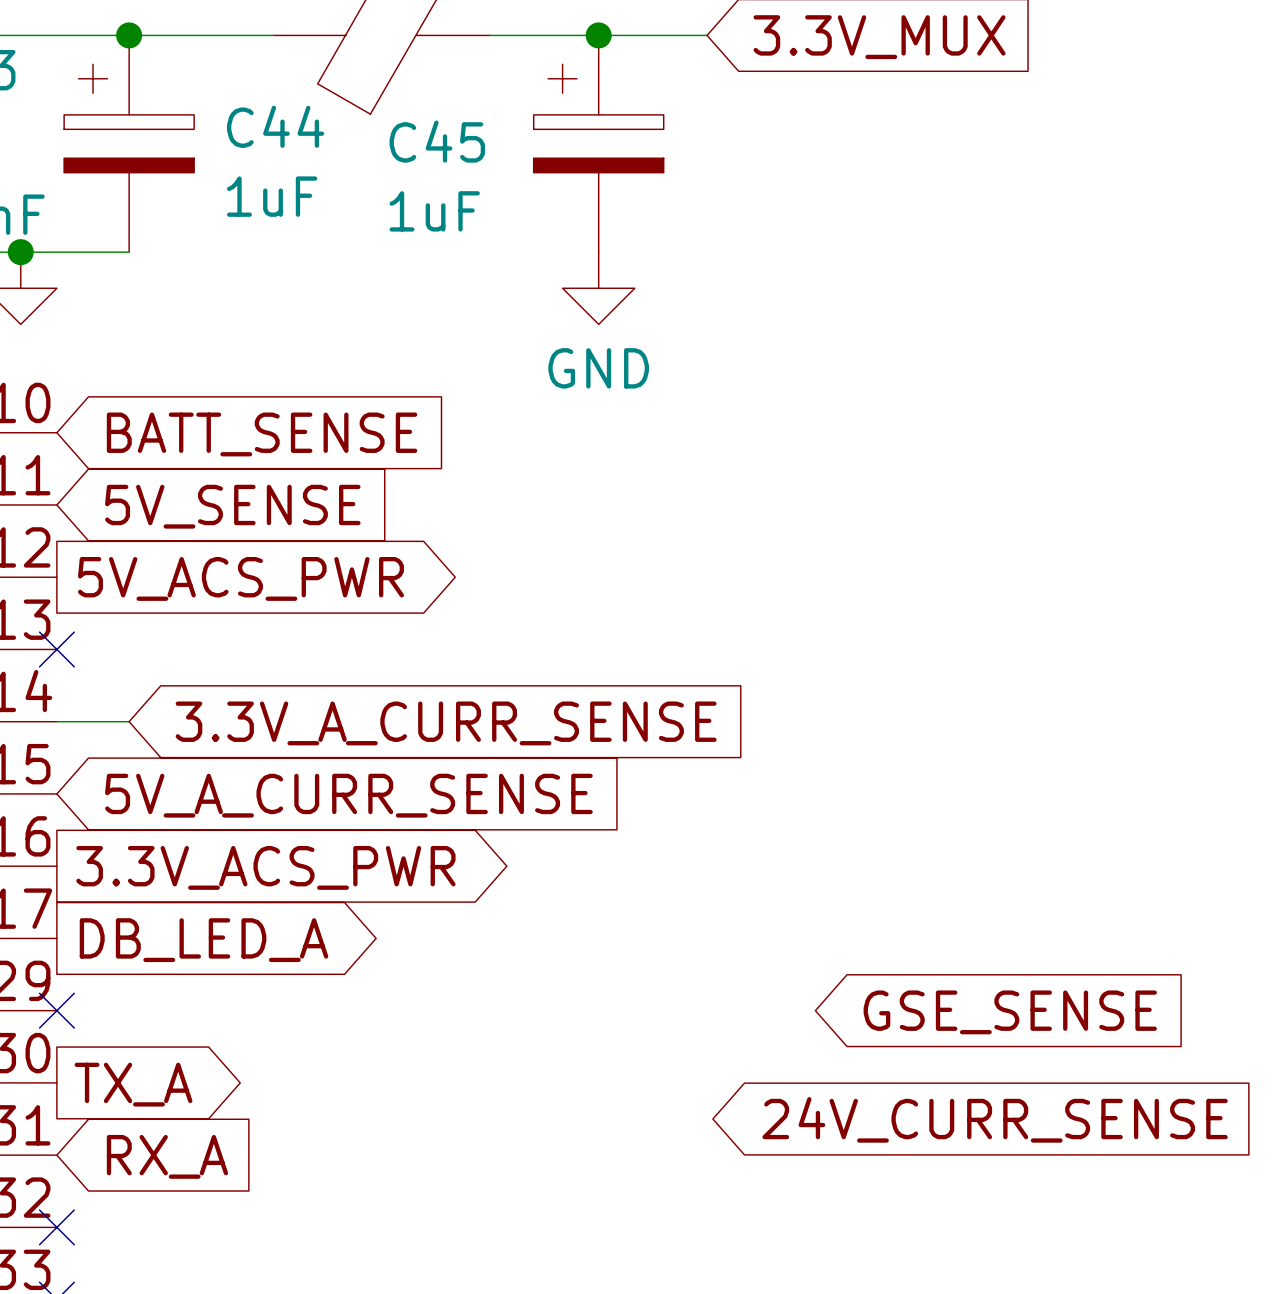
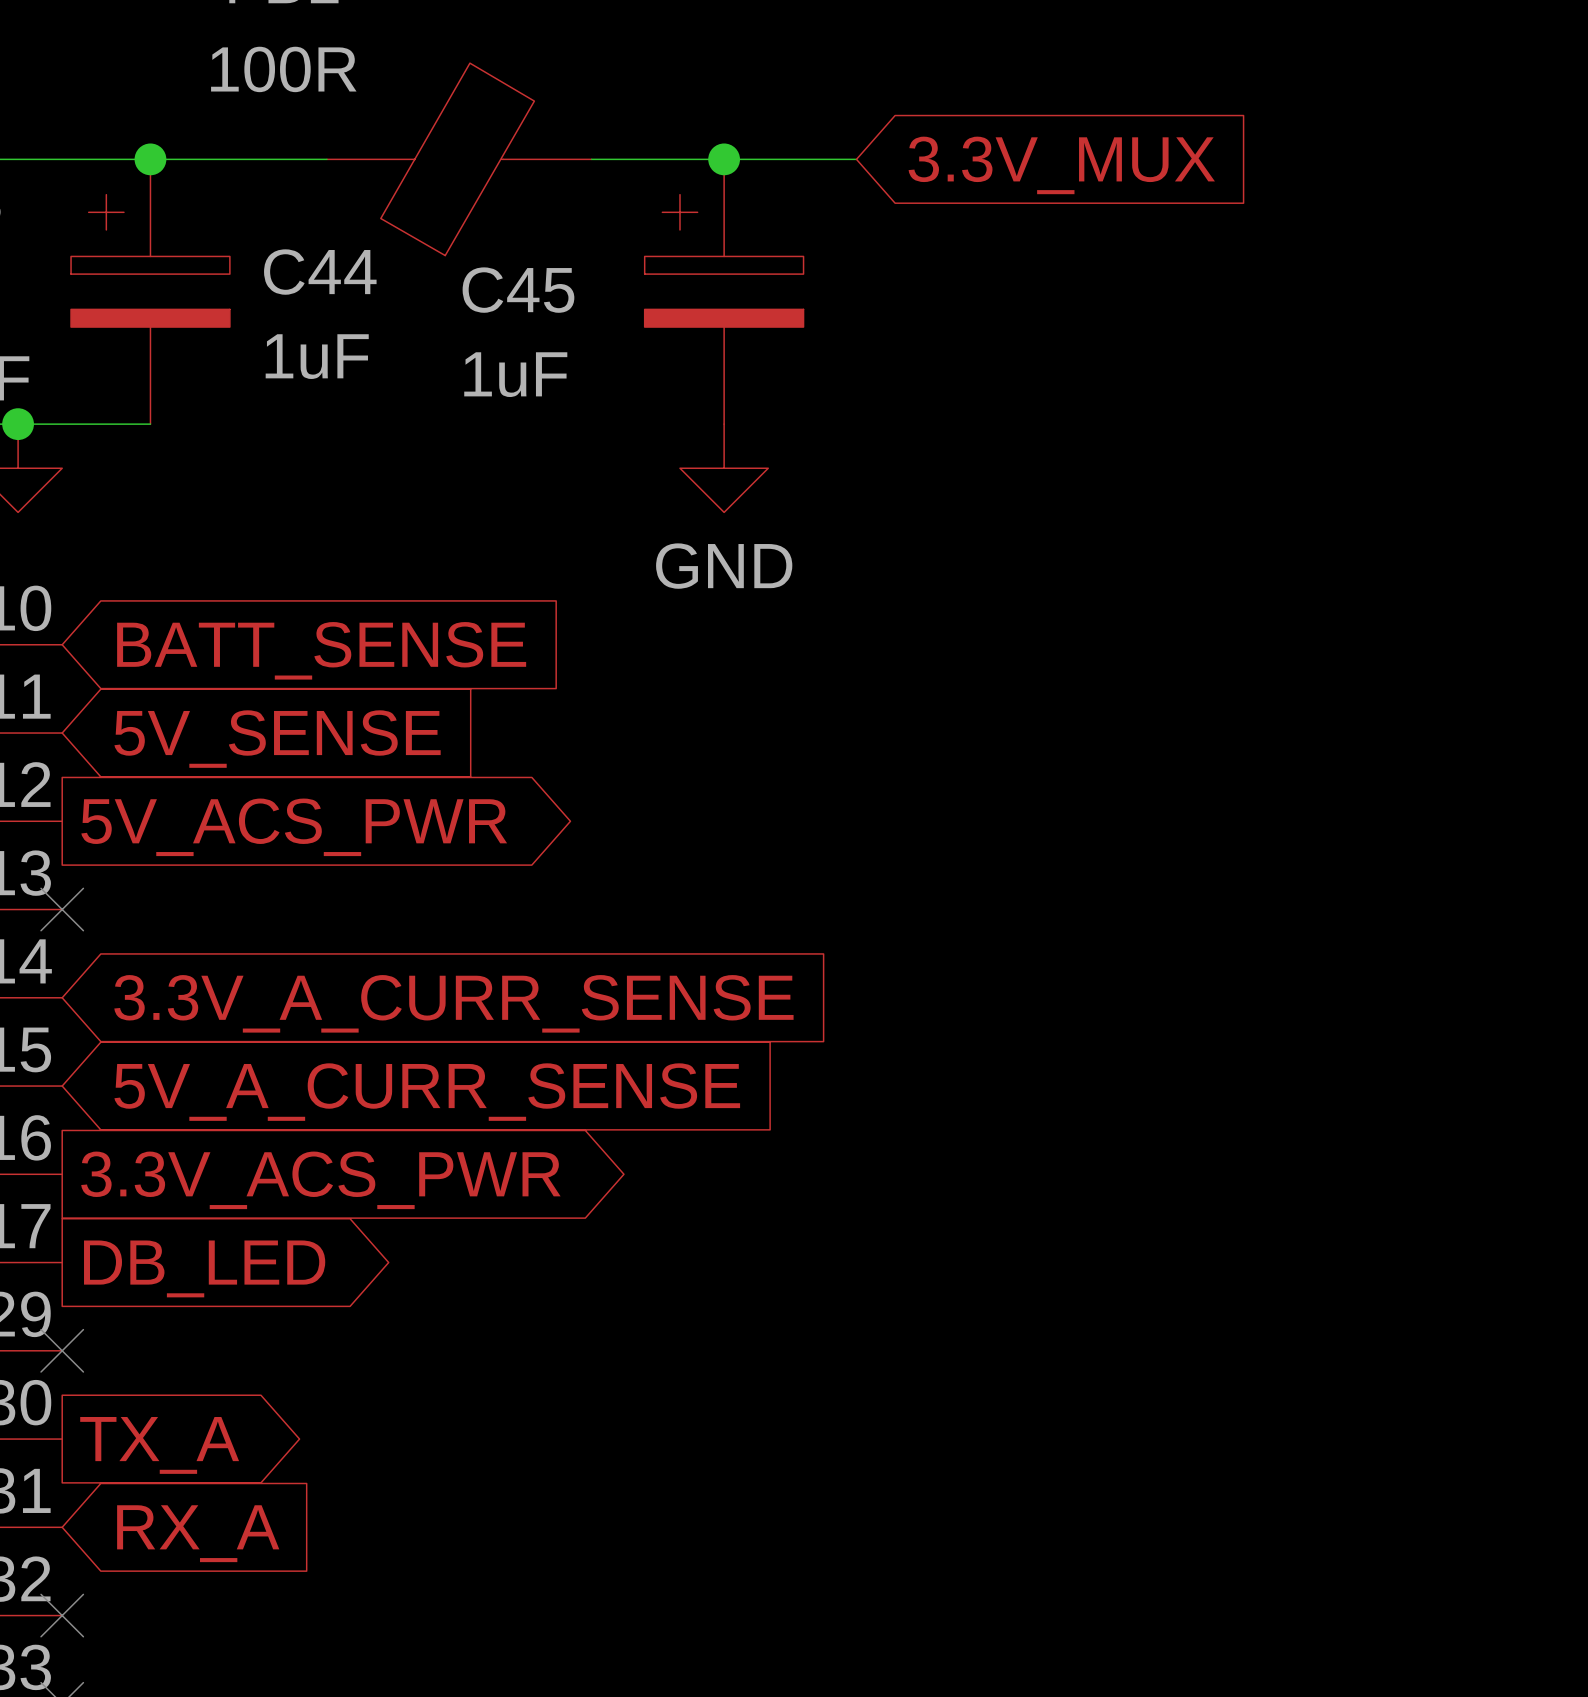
wire: (56, 721) (129, 721) -> none
global label position: 3.3V_A_CURR_SENSE (446, 723) -> 3.3V_A_CURR_SENSE (453, 1003)
global label: DB_LED_A (204, 940) -> DB_LED (204, 1268)
global label: GSE_SENSE (1010, 1012) -> none
global label: 24V_CURR_SENSE (995, 1119) -> none

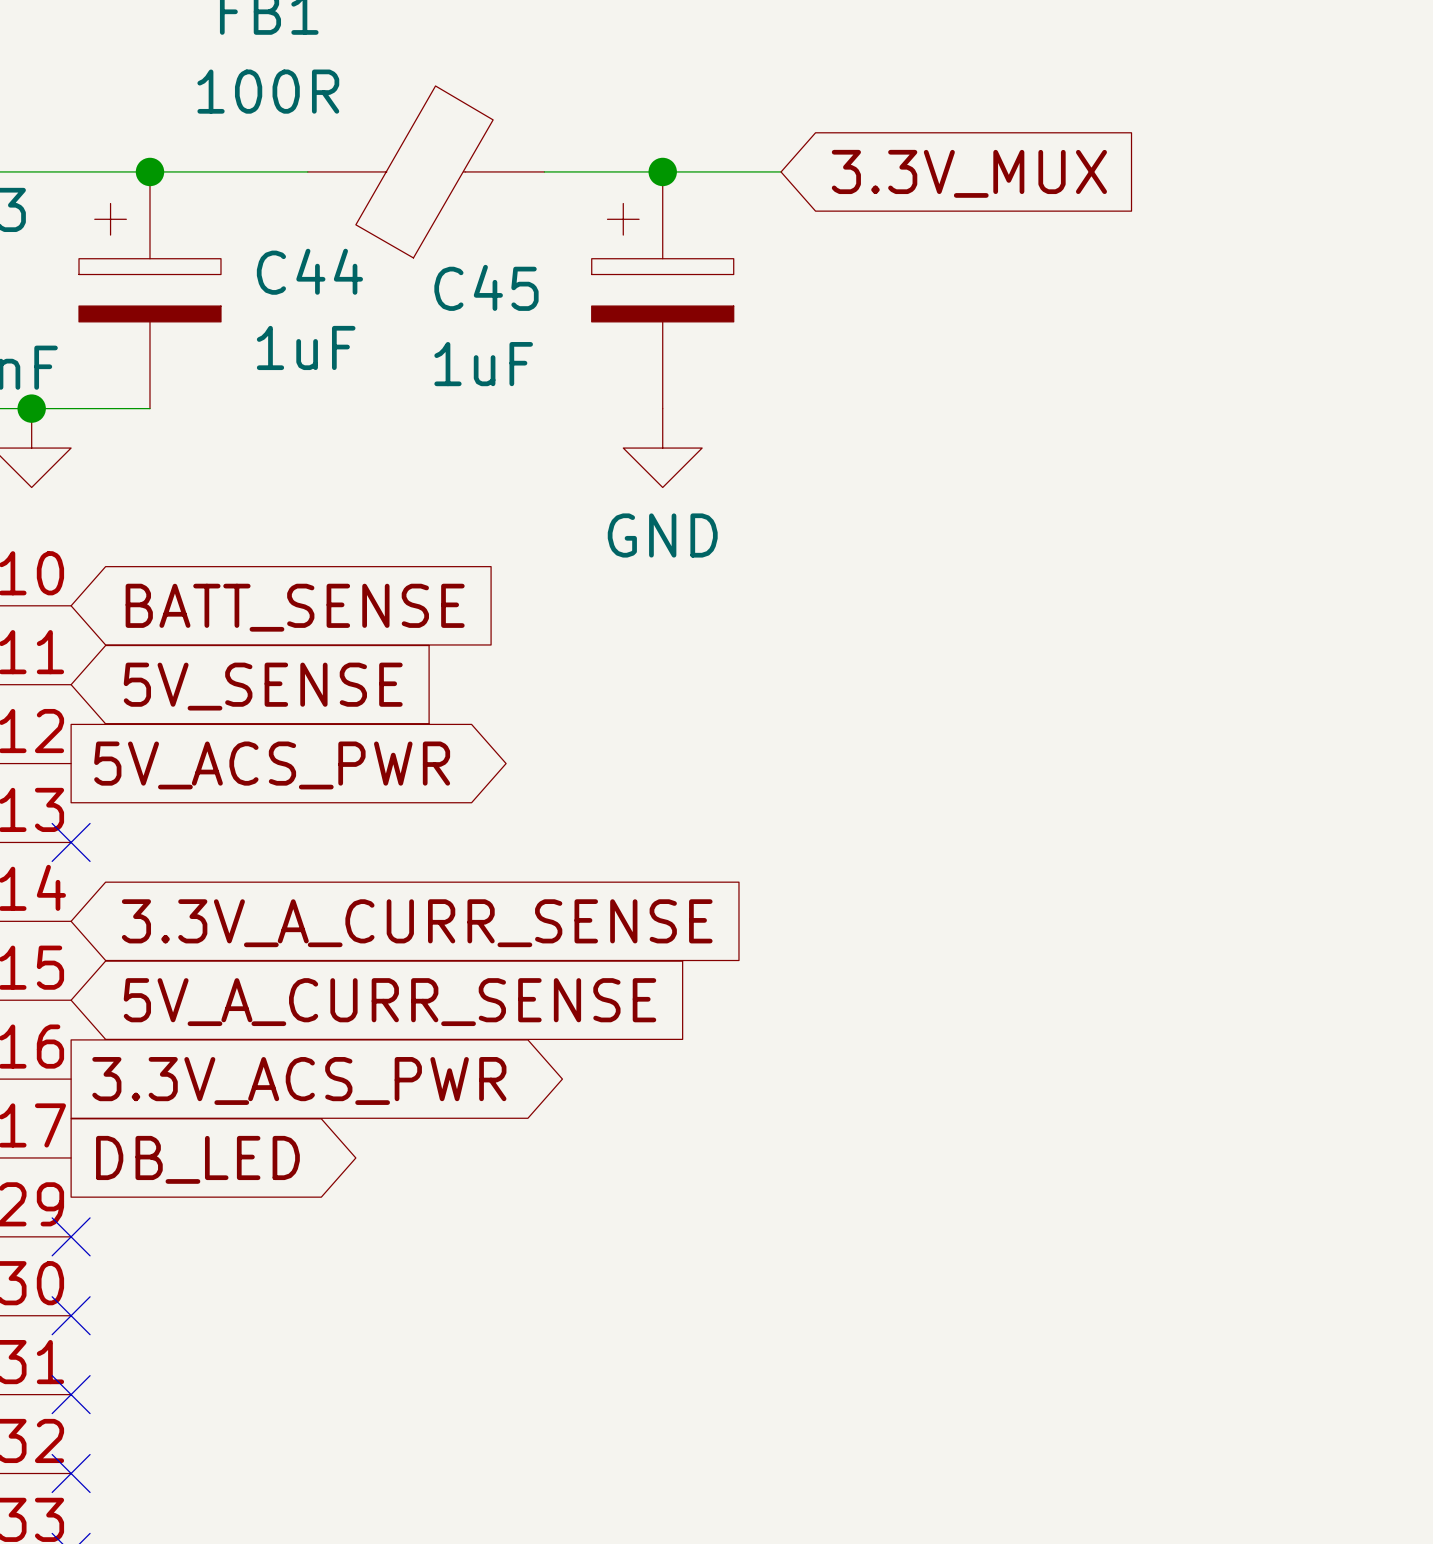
no-connect mark: none -> (71, 1315)
global label: TX_A (159, 1445) -> none
no-connect mark: none -> (71, 1394)
global label: RX_A (198, 1533) -> none

